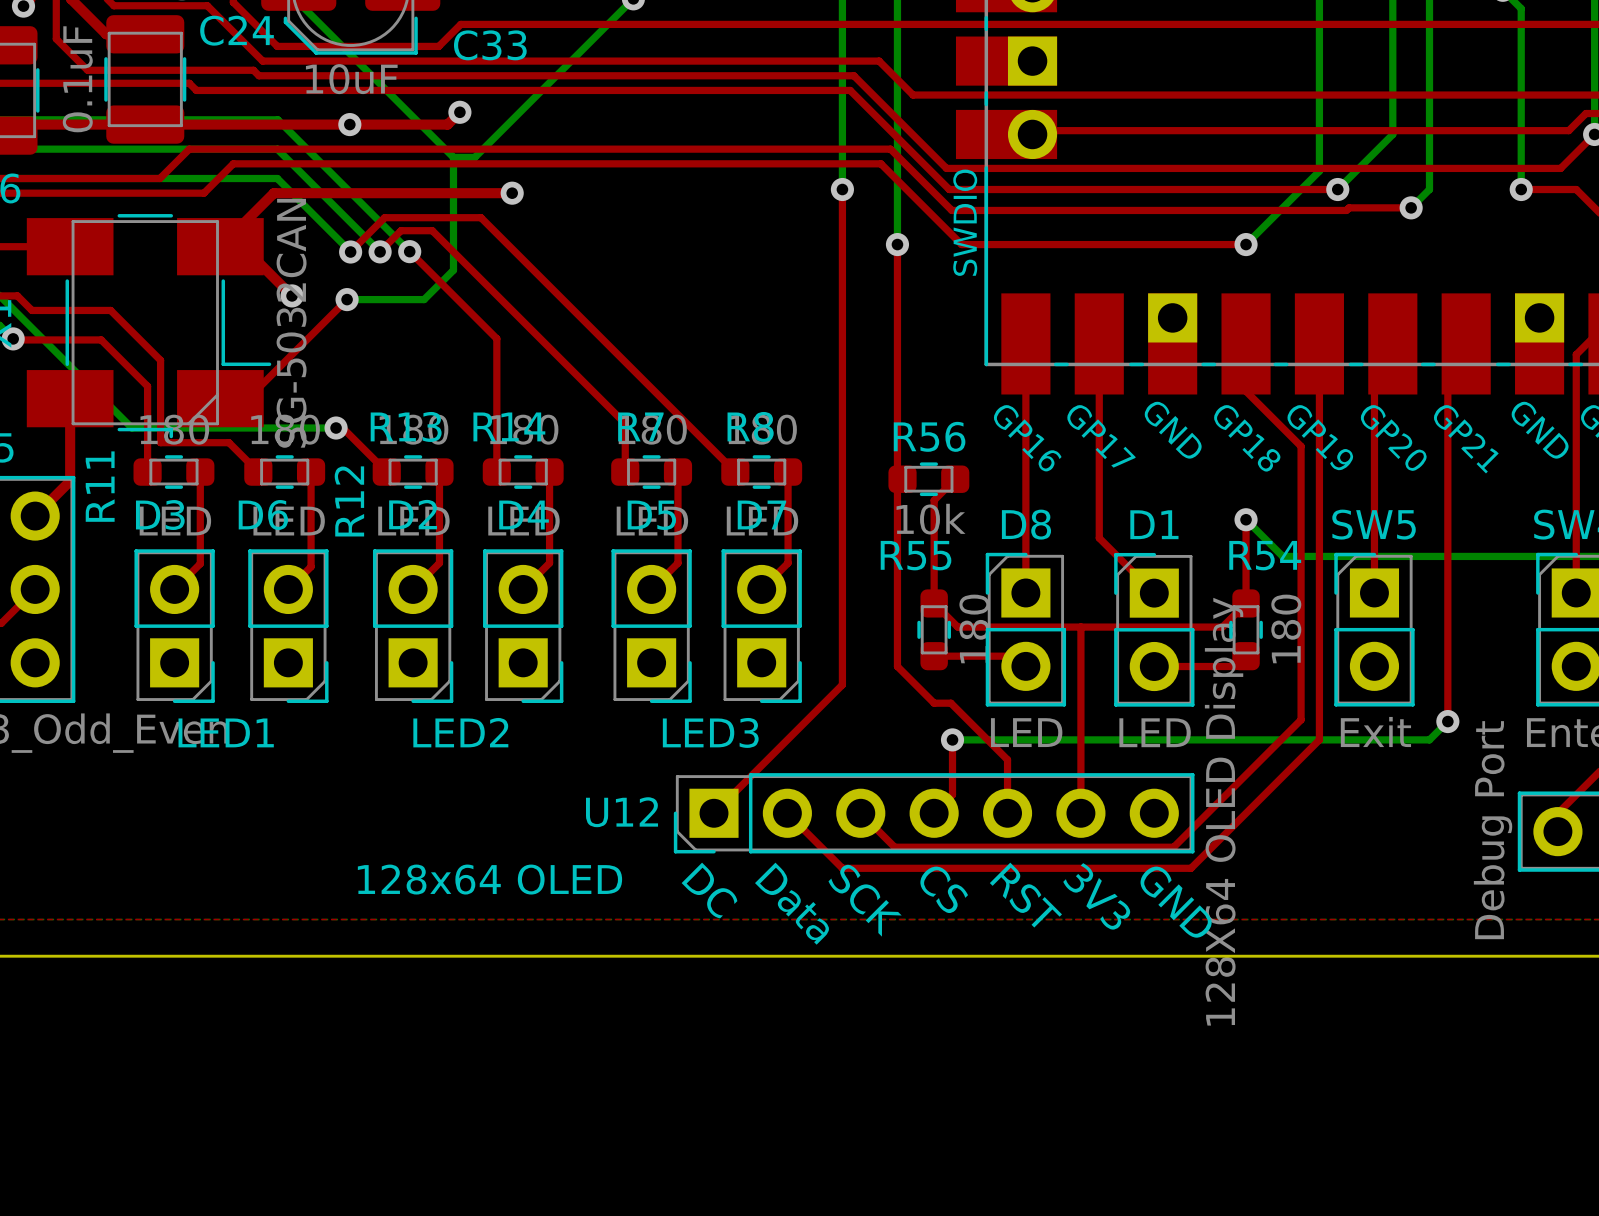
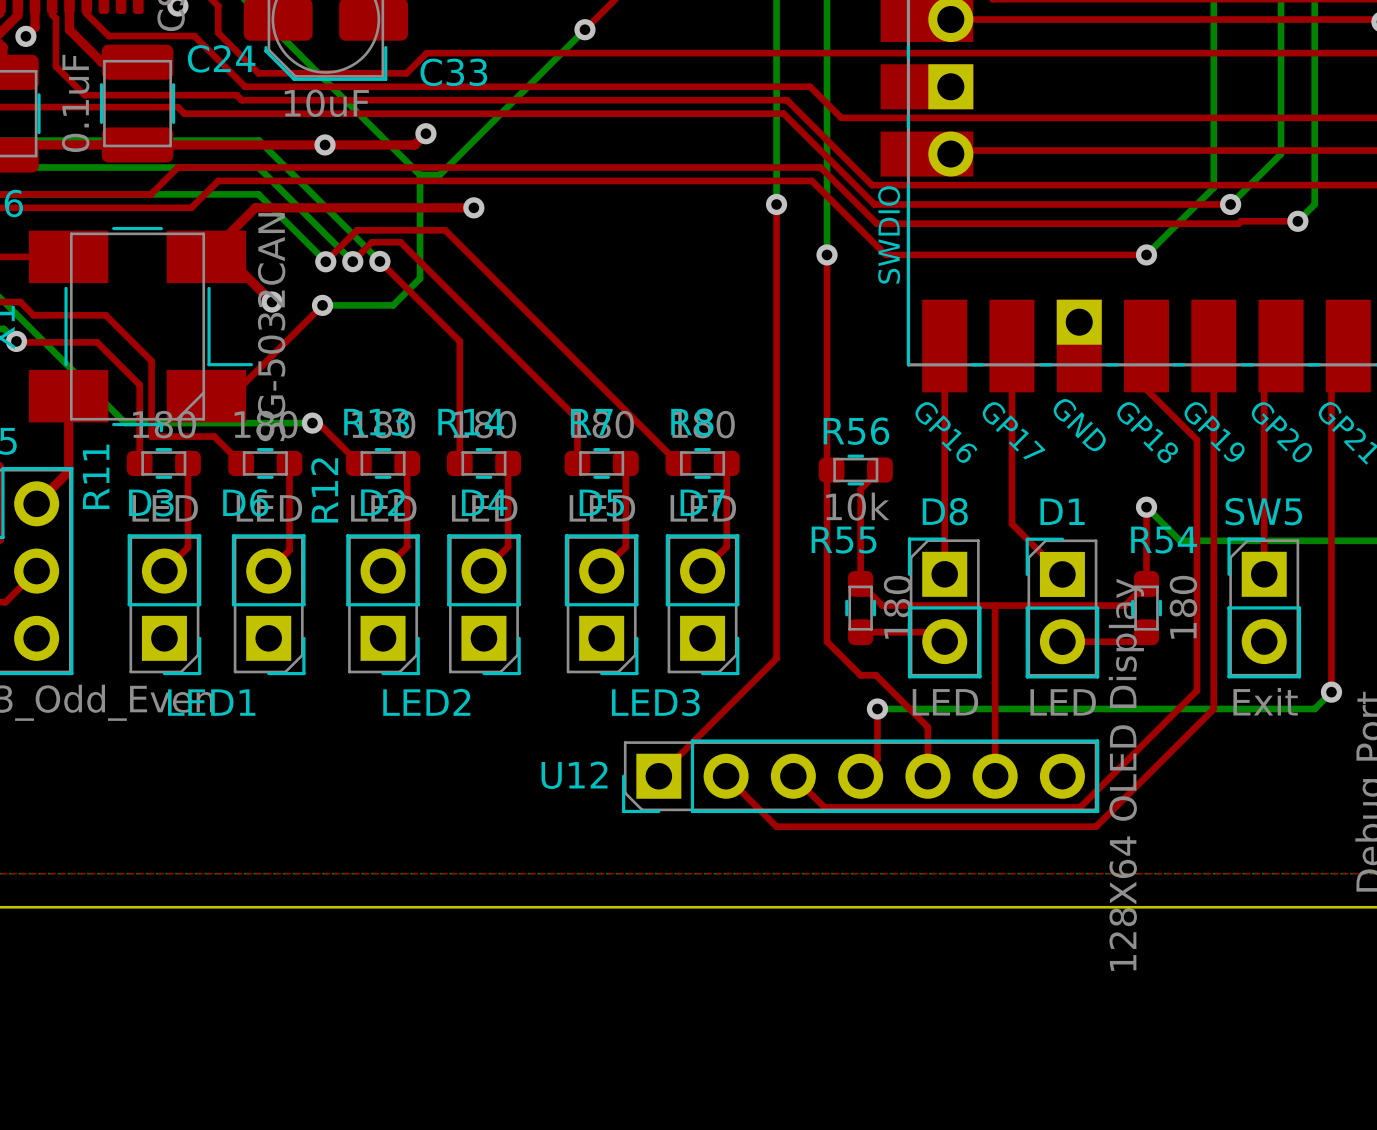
text: 128x64 OLED (489, 879) -> none
text: CS (944, 889) -> none
text: DC (709, 890) -> none
text: RST (1025, 895) -> none
text: 3V3 (1096, 896) -> none
text: SCK (865, 900) -> none
text: GND (1176, 902) -> none
text: Data (792, 903) -> none

